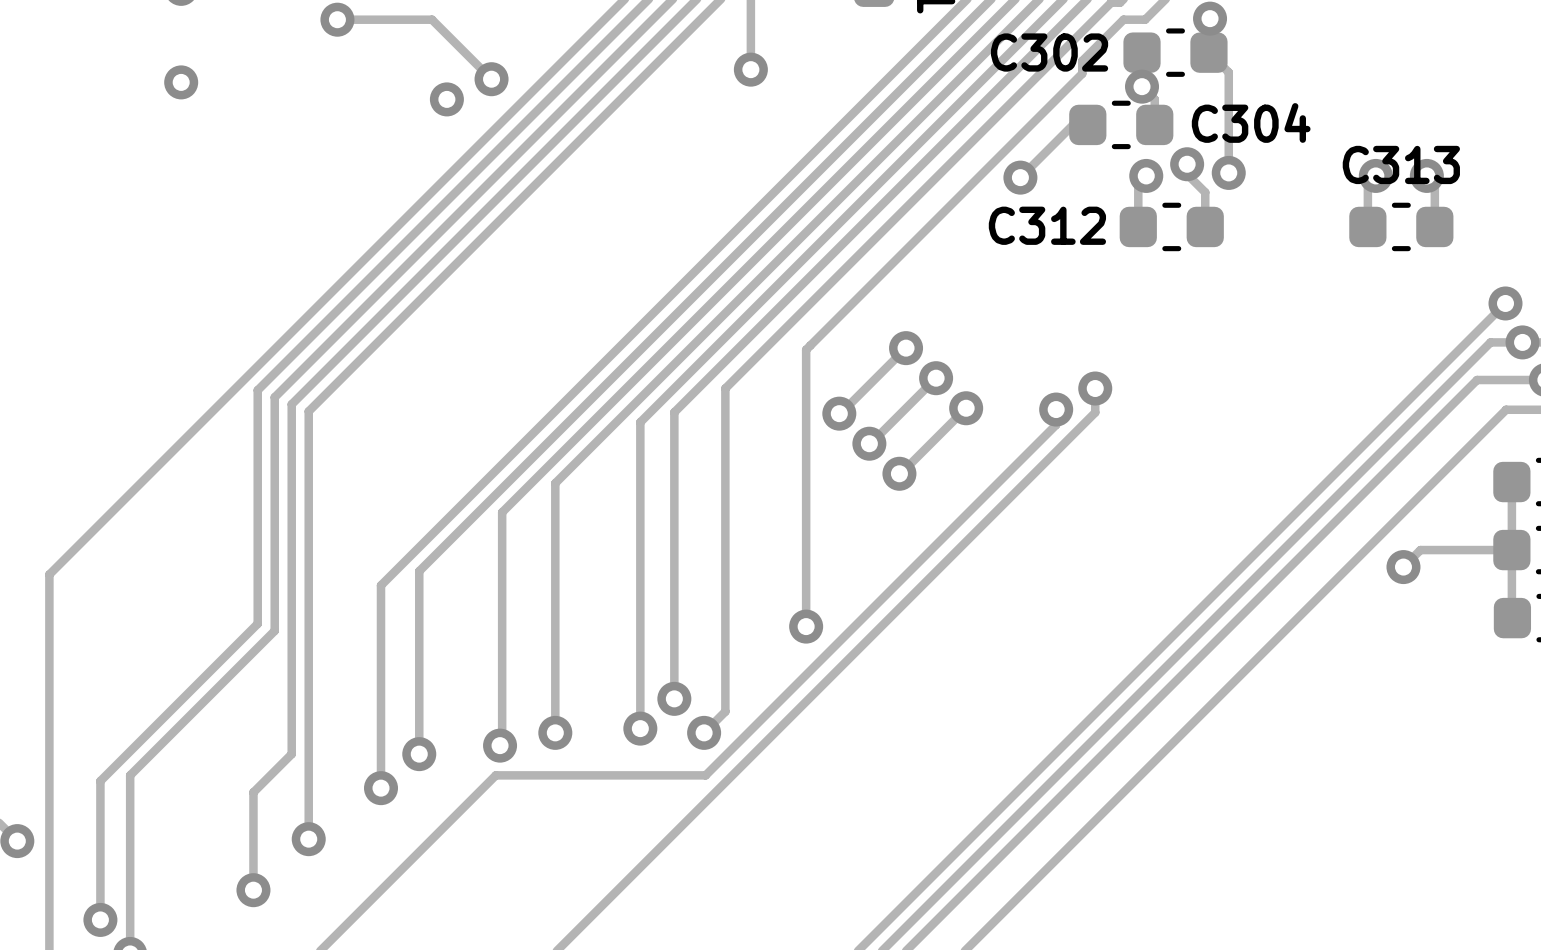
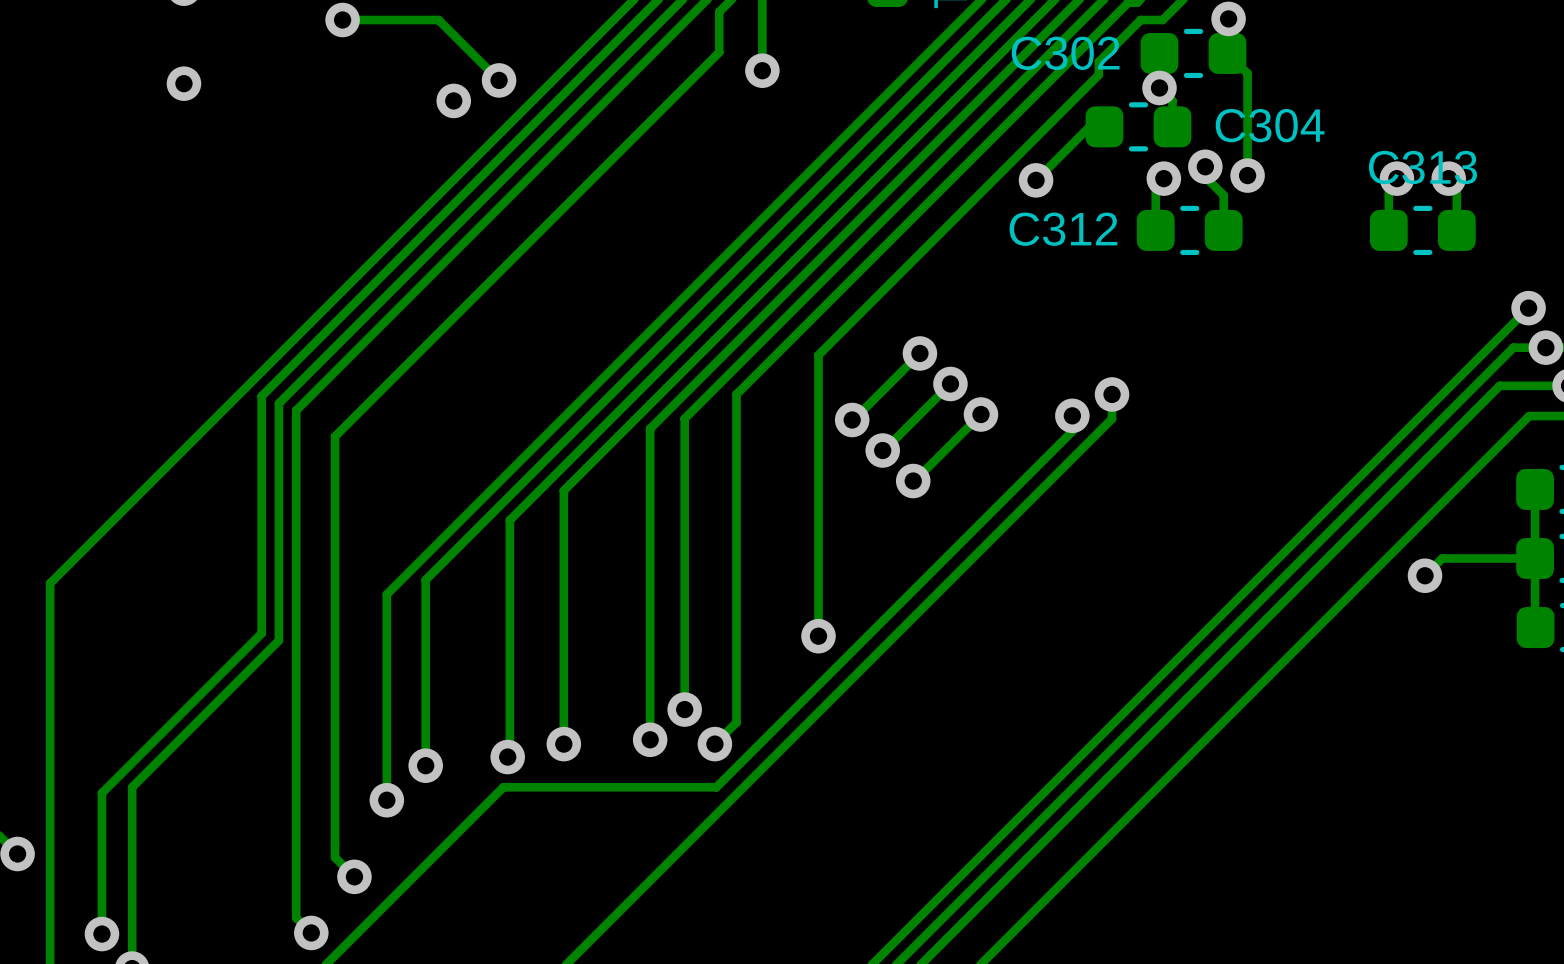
track: (708, 11) (308, 411) (308, 839) -> (719, 11) (719, 52) (335, 436) (335, 857) (354, 876)
track: (291, 754) (253, 792) (253, 890) -> (296, 765) (296, 917) (311, 932)
via: (308, 839) -> none
via: none -> (354, 876)
via: (253, 890) -> none
via: none -> (311, 932)

